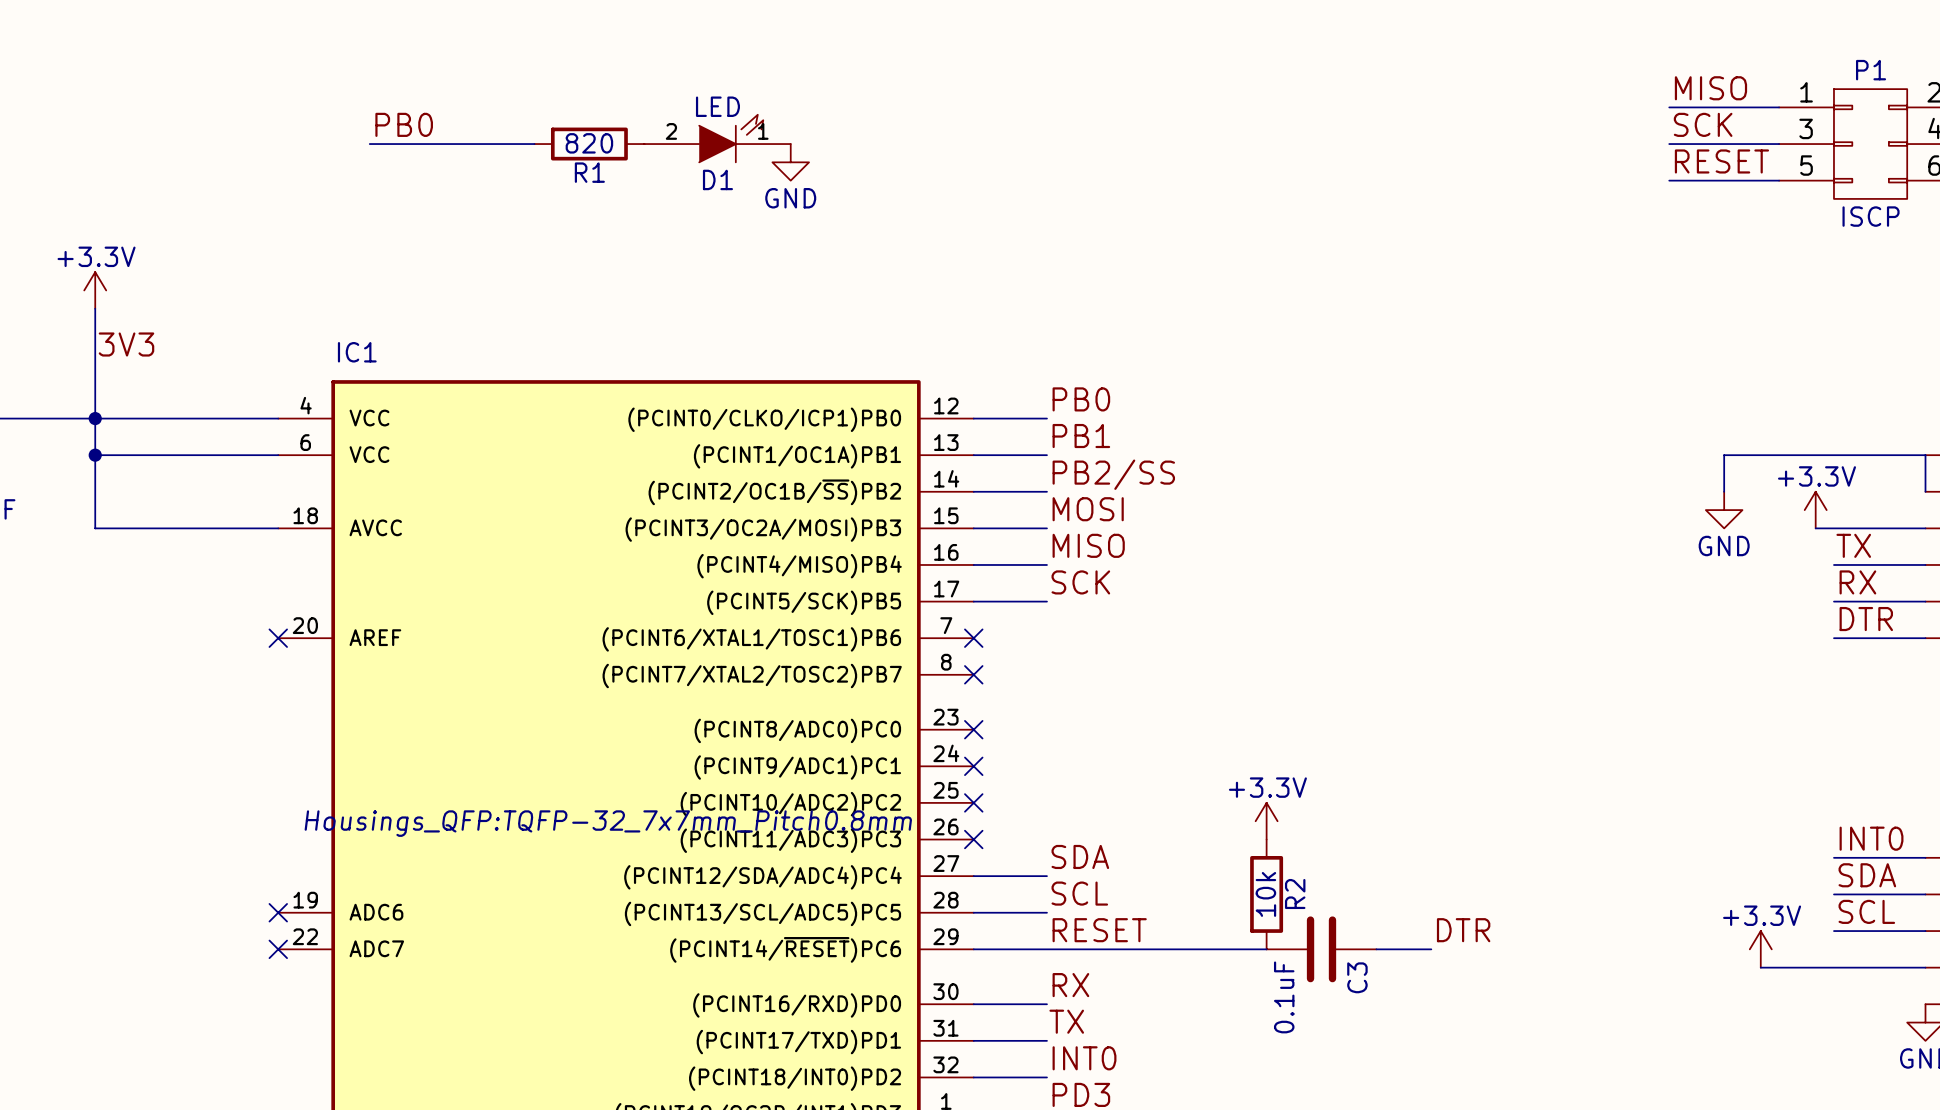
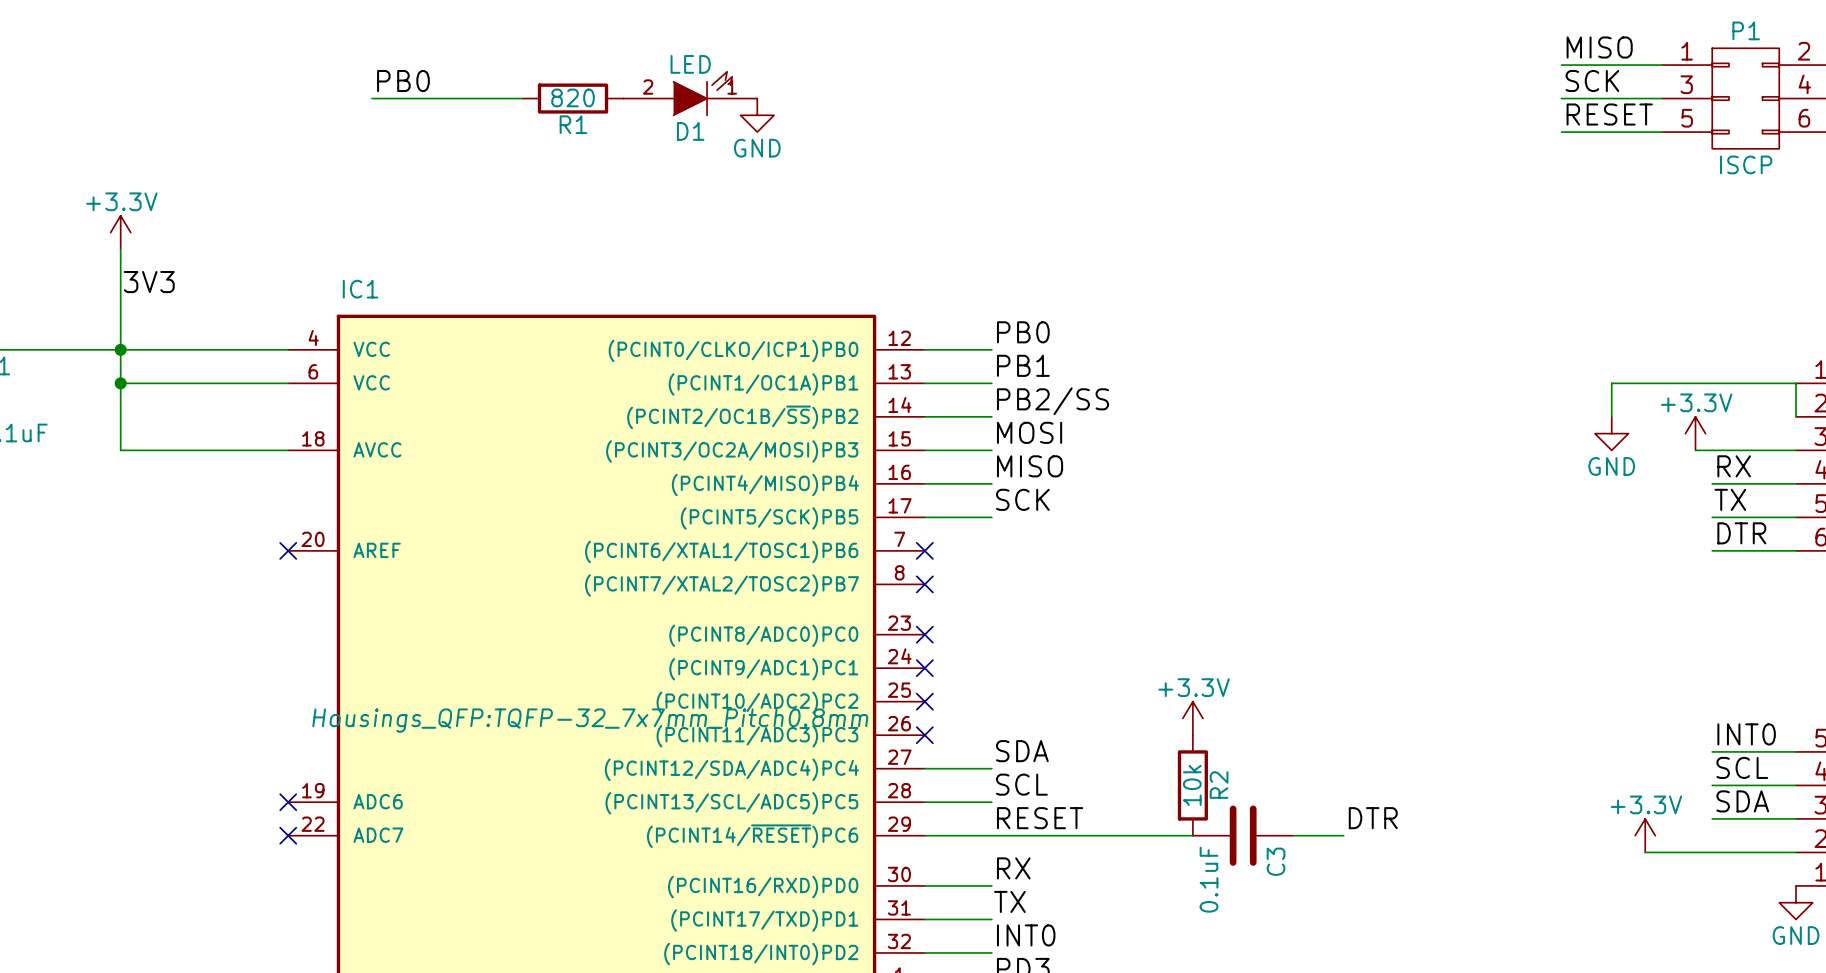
label: TX (1853, 545) -> RX (1734, 466)
label: RX (1857, 582) -> TX (1730, 499)
label: SDA (1867, 875) -> SCL (1742, 767)
label: SCL (1866, 911) -> SDA (1742, 801)

